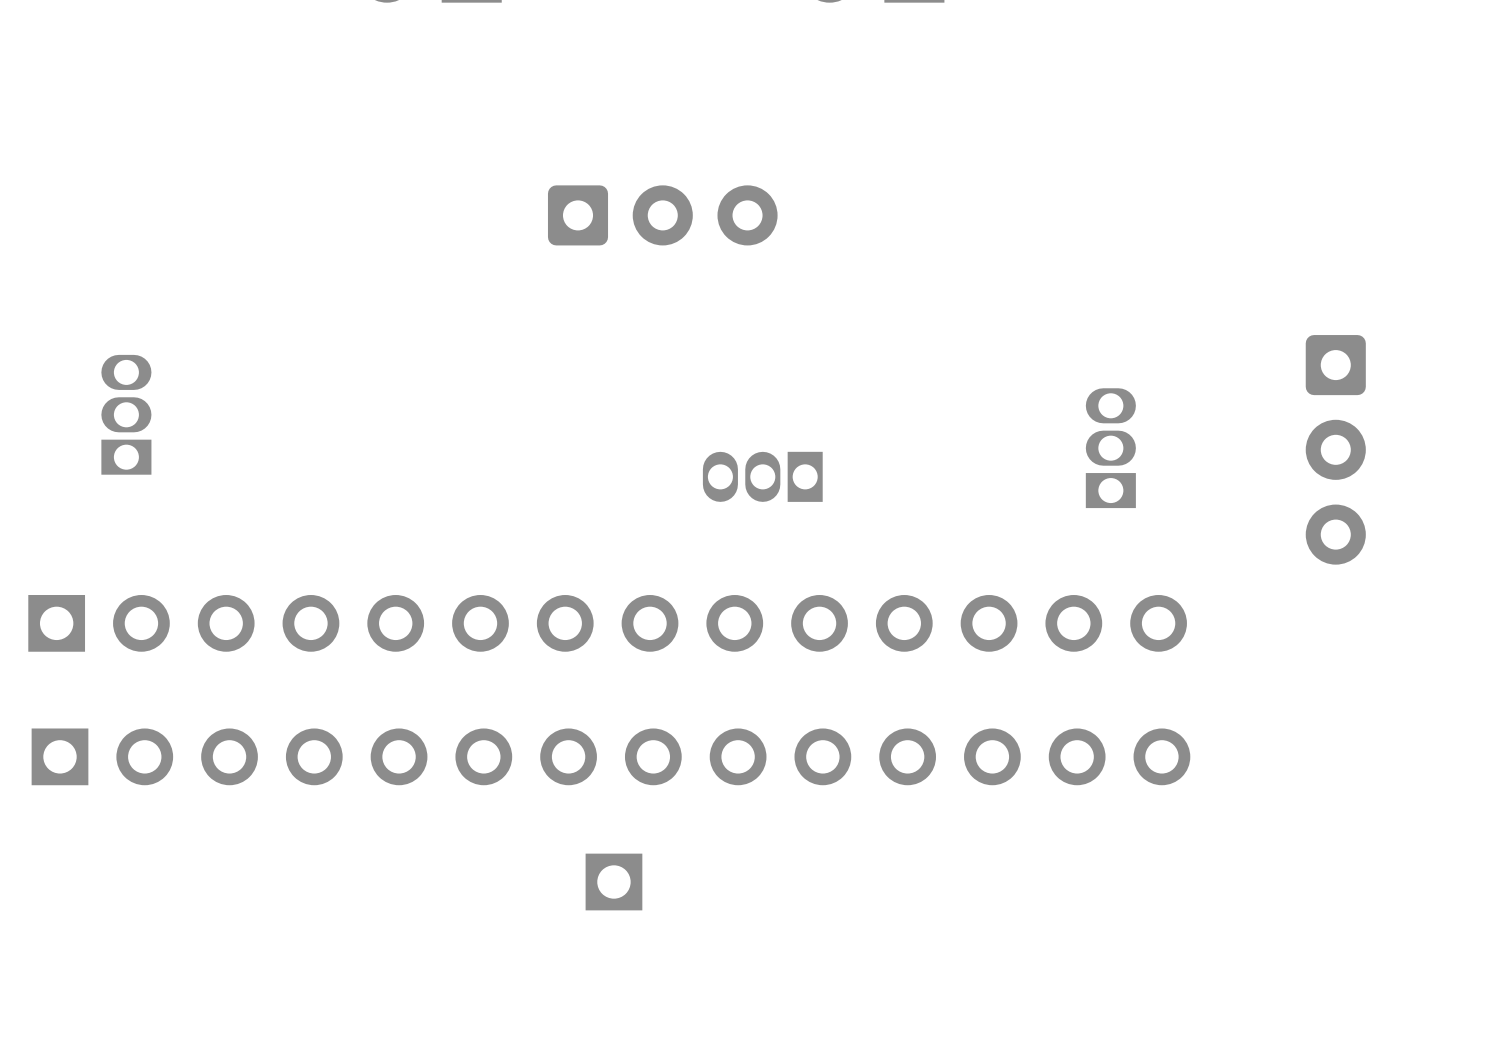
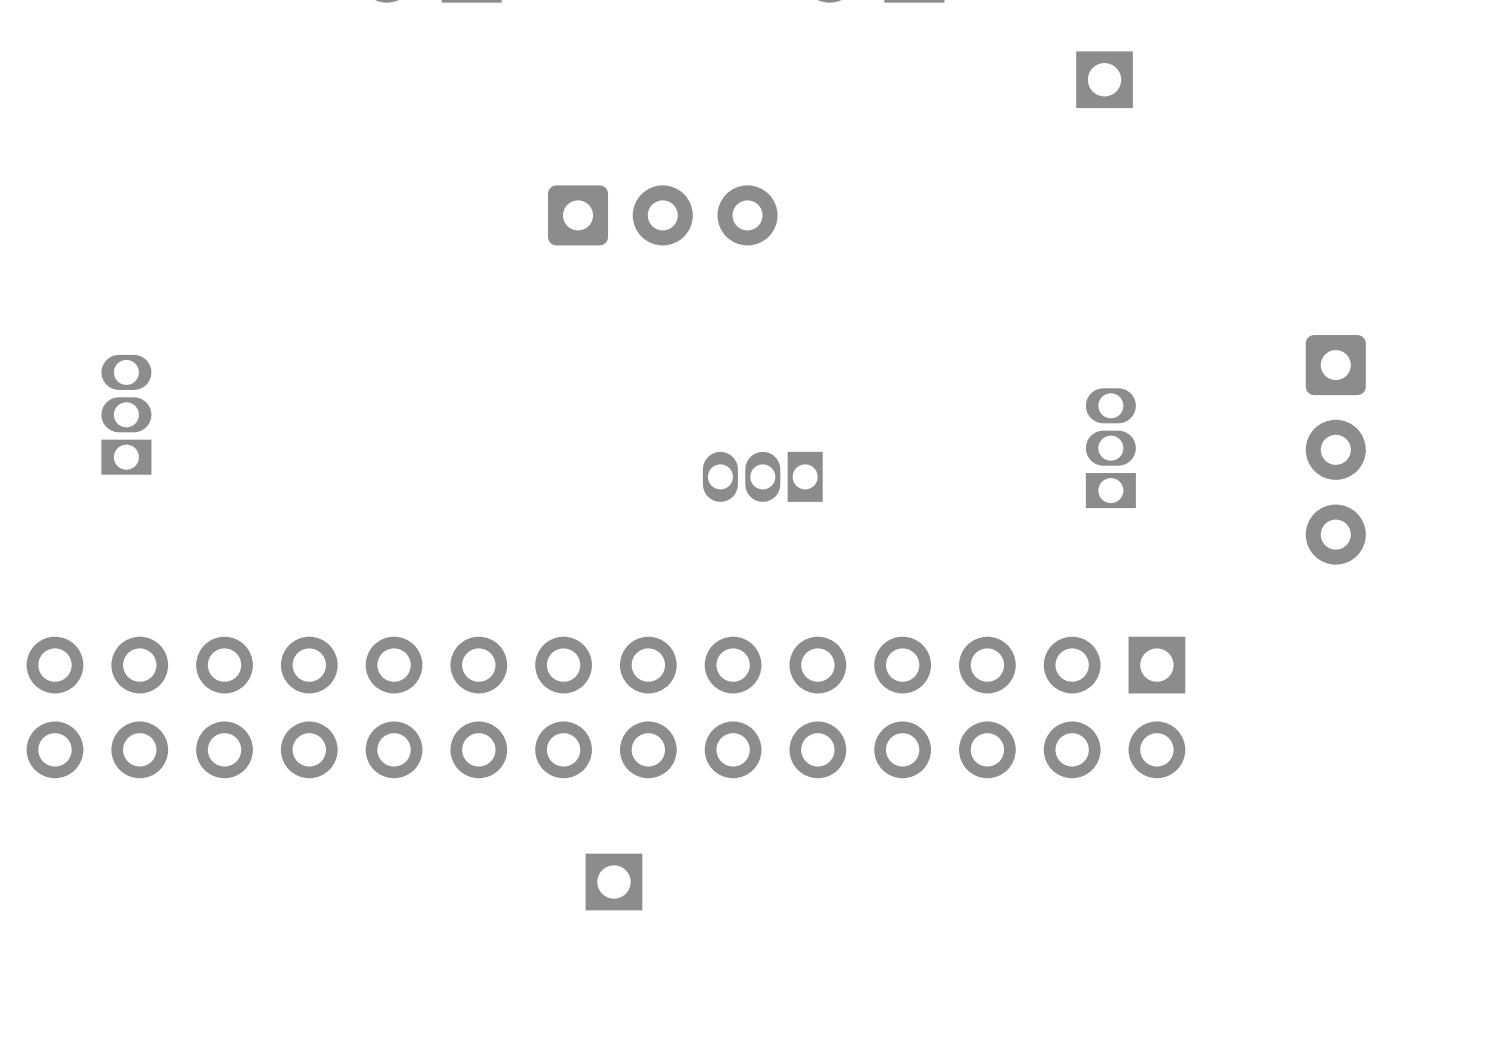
part: none -> (1104, 79)
part: (607, 623) -> none
part: none -> (605, 707)
part: (610, 756) -> none

